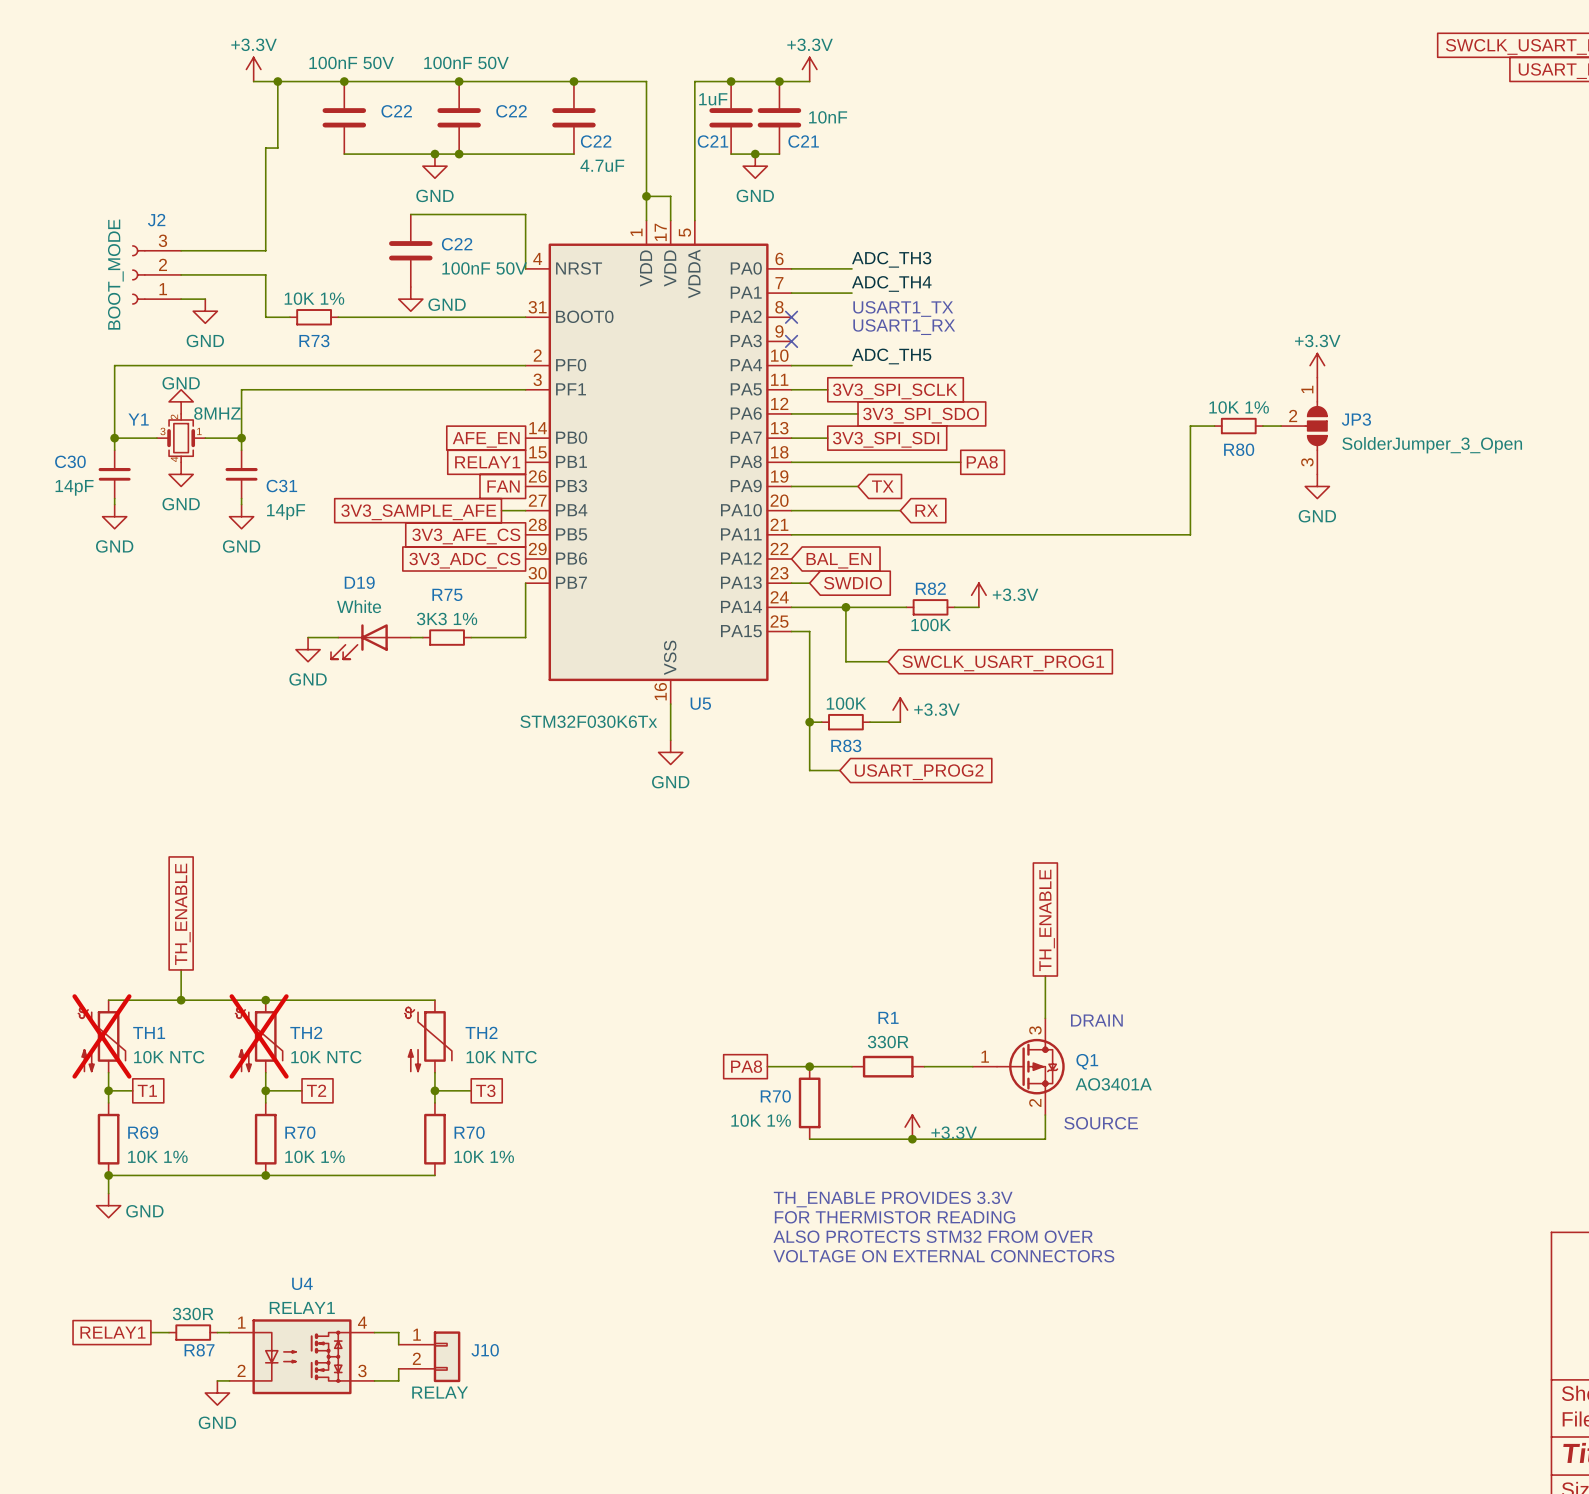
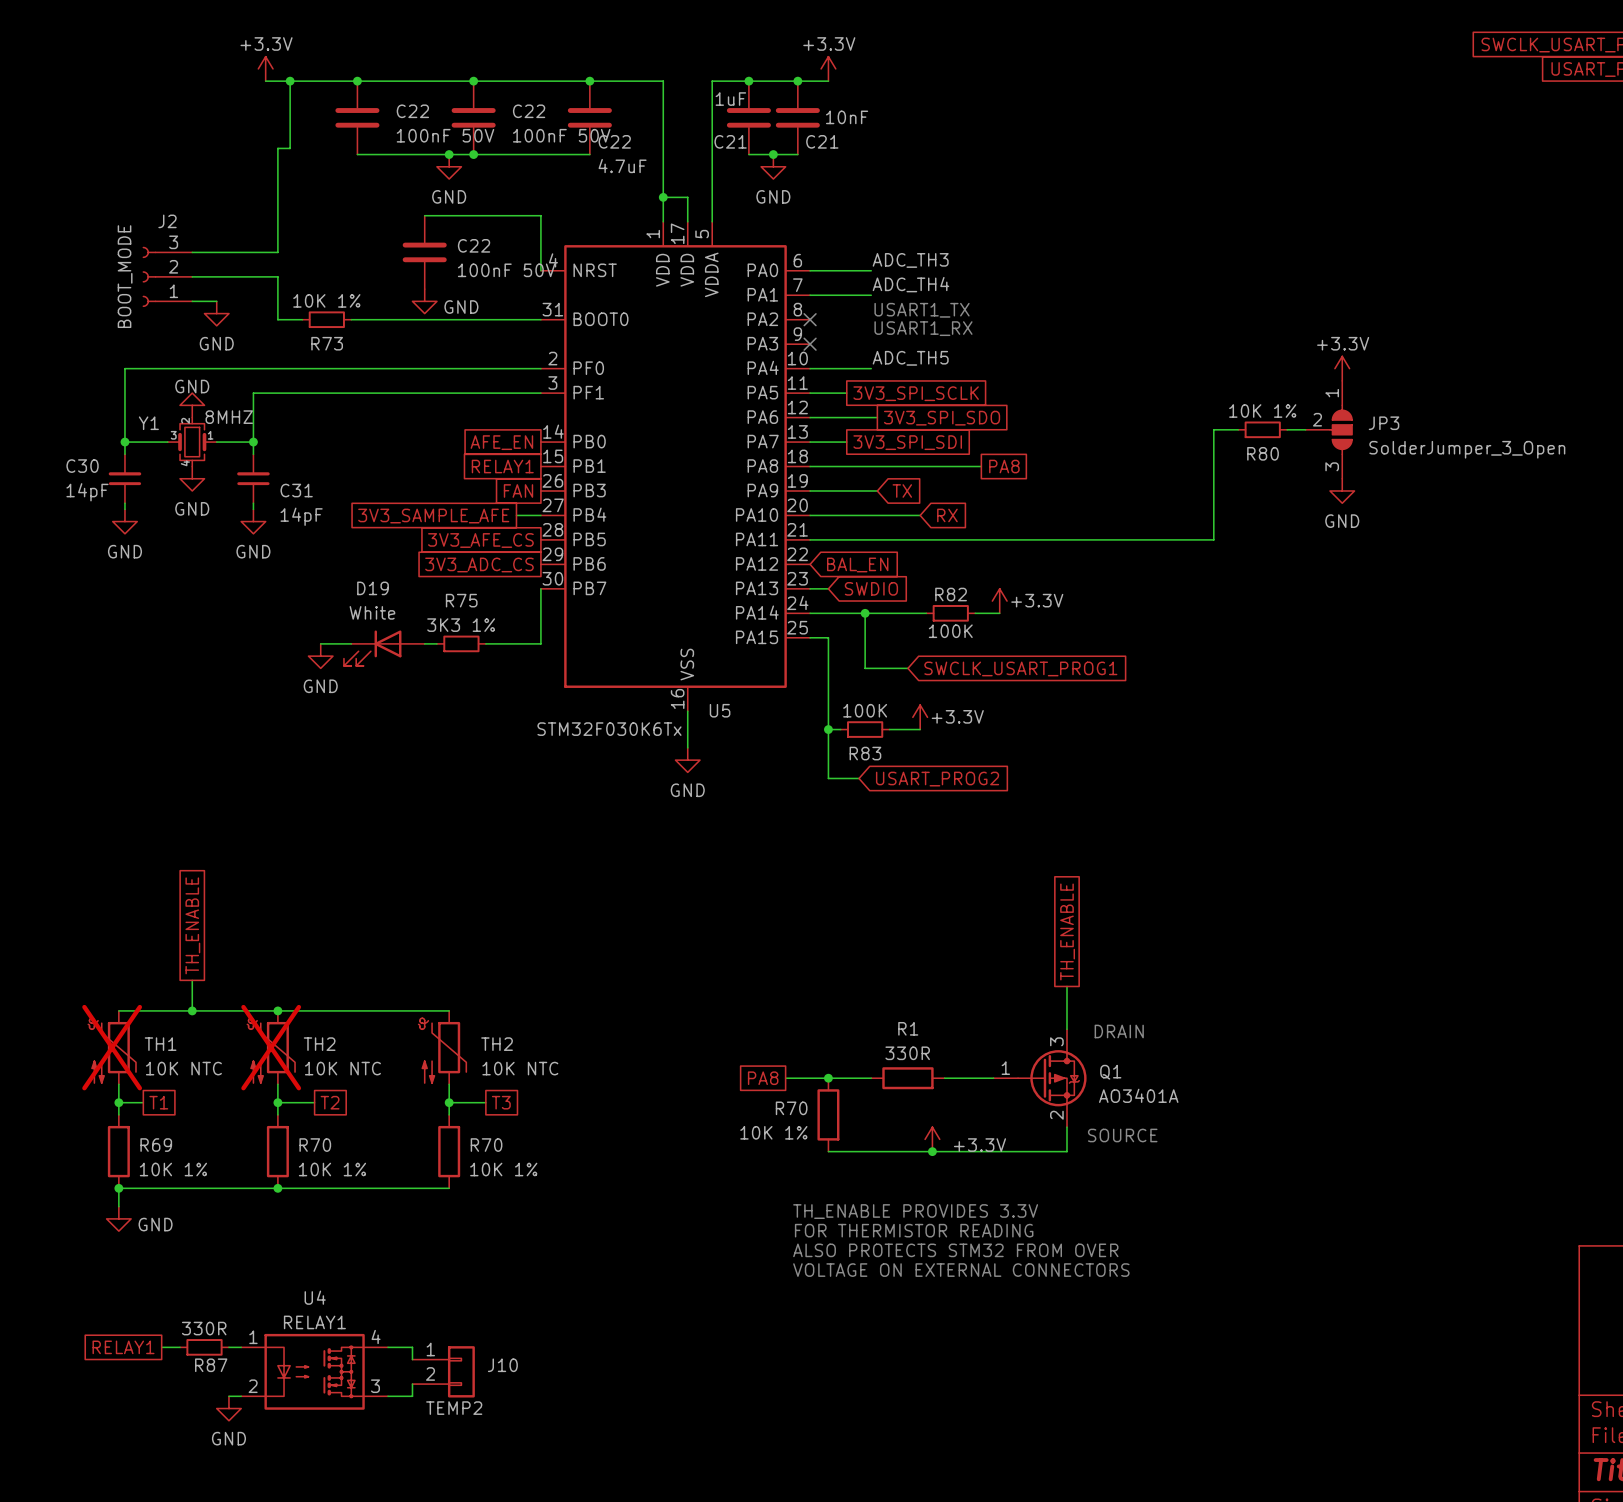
C22 value position: 100nF 50V (351, 62) -> 100nF 50V (445, 135)
C22 value position: 100nF 50V (466, 62) -> 100nF 50V (561, 135)
J10 value: RELAY (440, 1392) -> TEMP2 (454, 1408)

